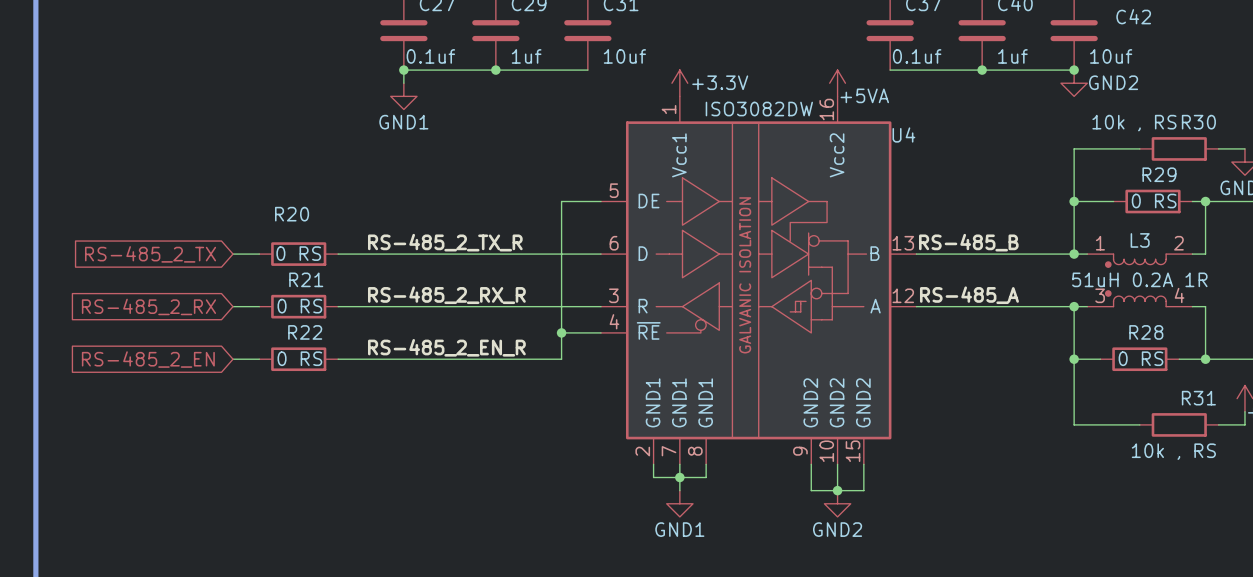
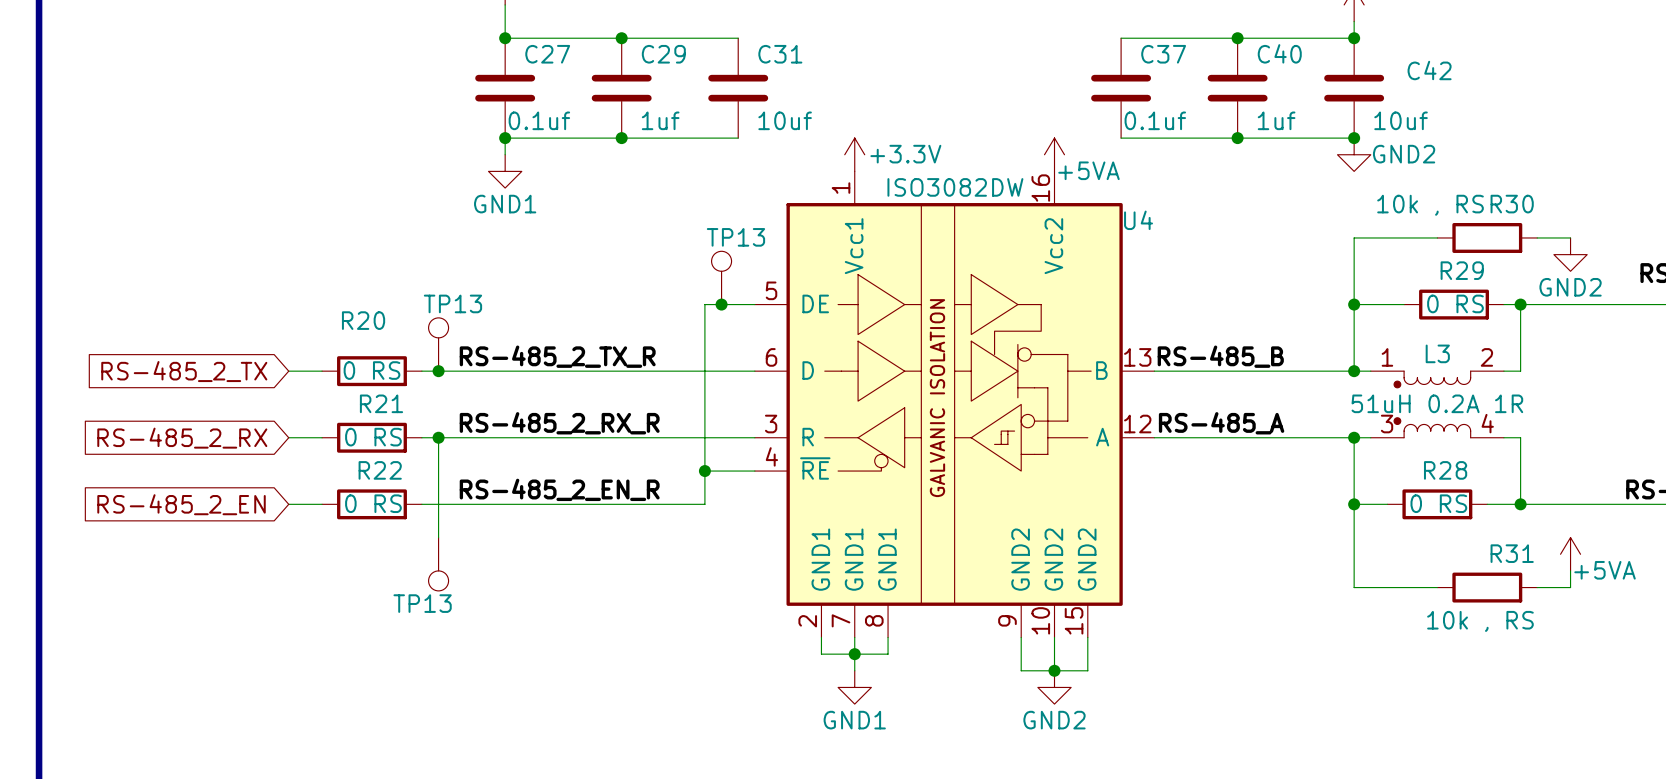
TP13: none -> (721, 277)
junction: none -> (721, 304)
TP13: none -> (438, 344)
junction: none -> (438, 371)
wire: none -> (438, 437) (438, 537)
junction: none -> (438, 437)
TP13: none -> (438, 564)

